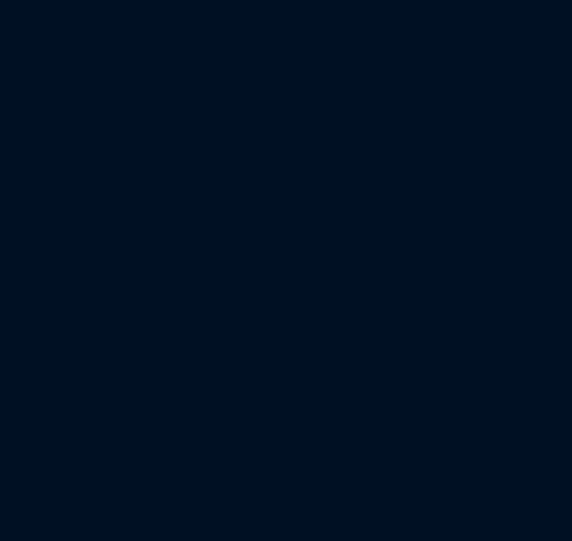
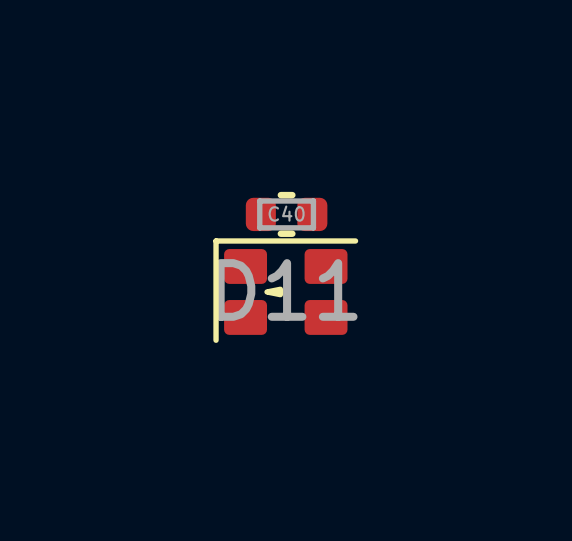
C40: none -> (286, 214)
D11: none -> (285, 290)

